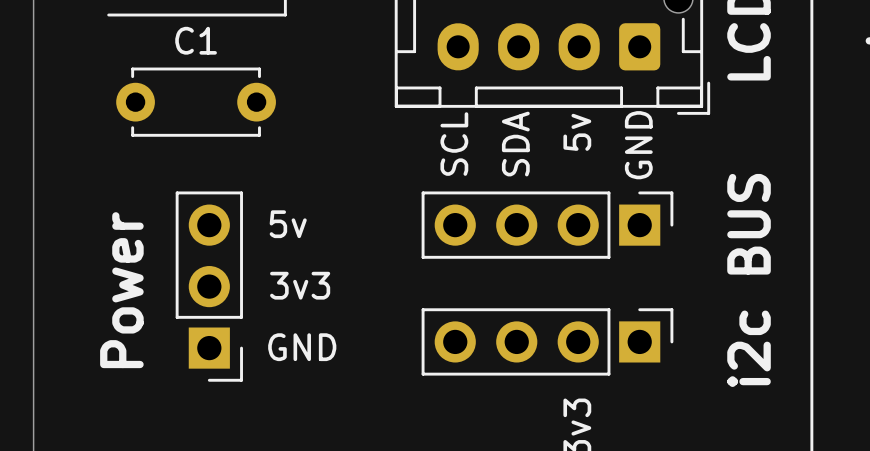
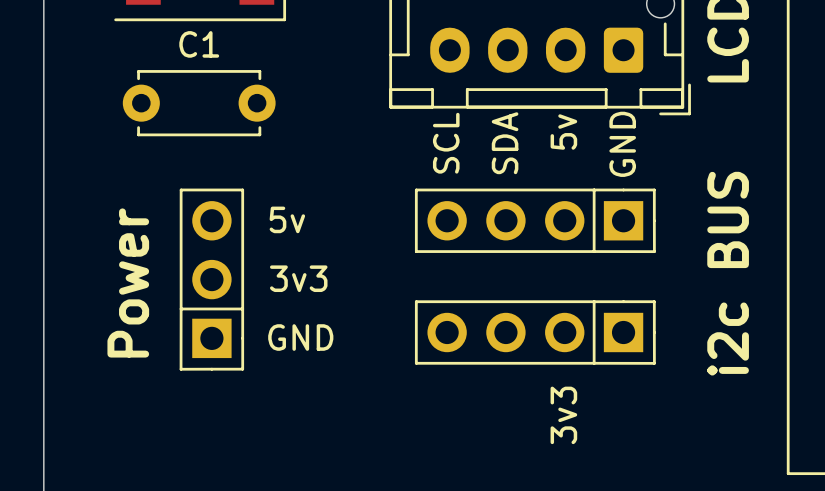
line: none -> (594, 189) (623, 189)
line: none -> (654, 220) (654, 251) (594, 251)
line: none -> (594, 301) (623, 301)
line: none -> (181, 308) (181, 369) (211, 369)
line: none -> (242, 308) (242, 338)
line: none -> (654, 332) (654, 363) (594, 363)

